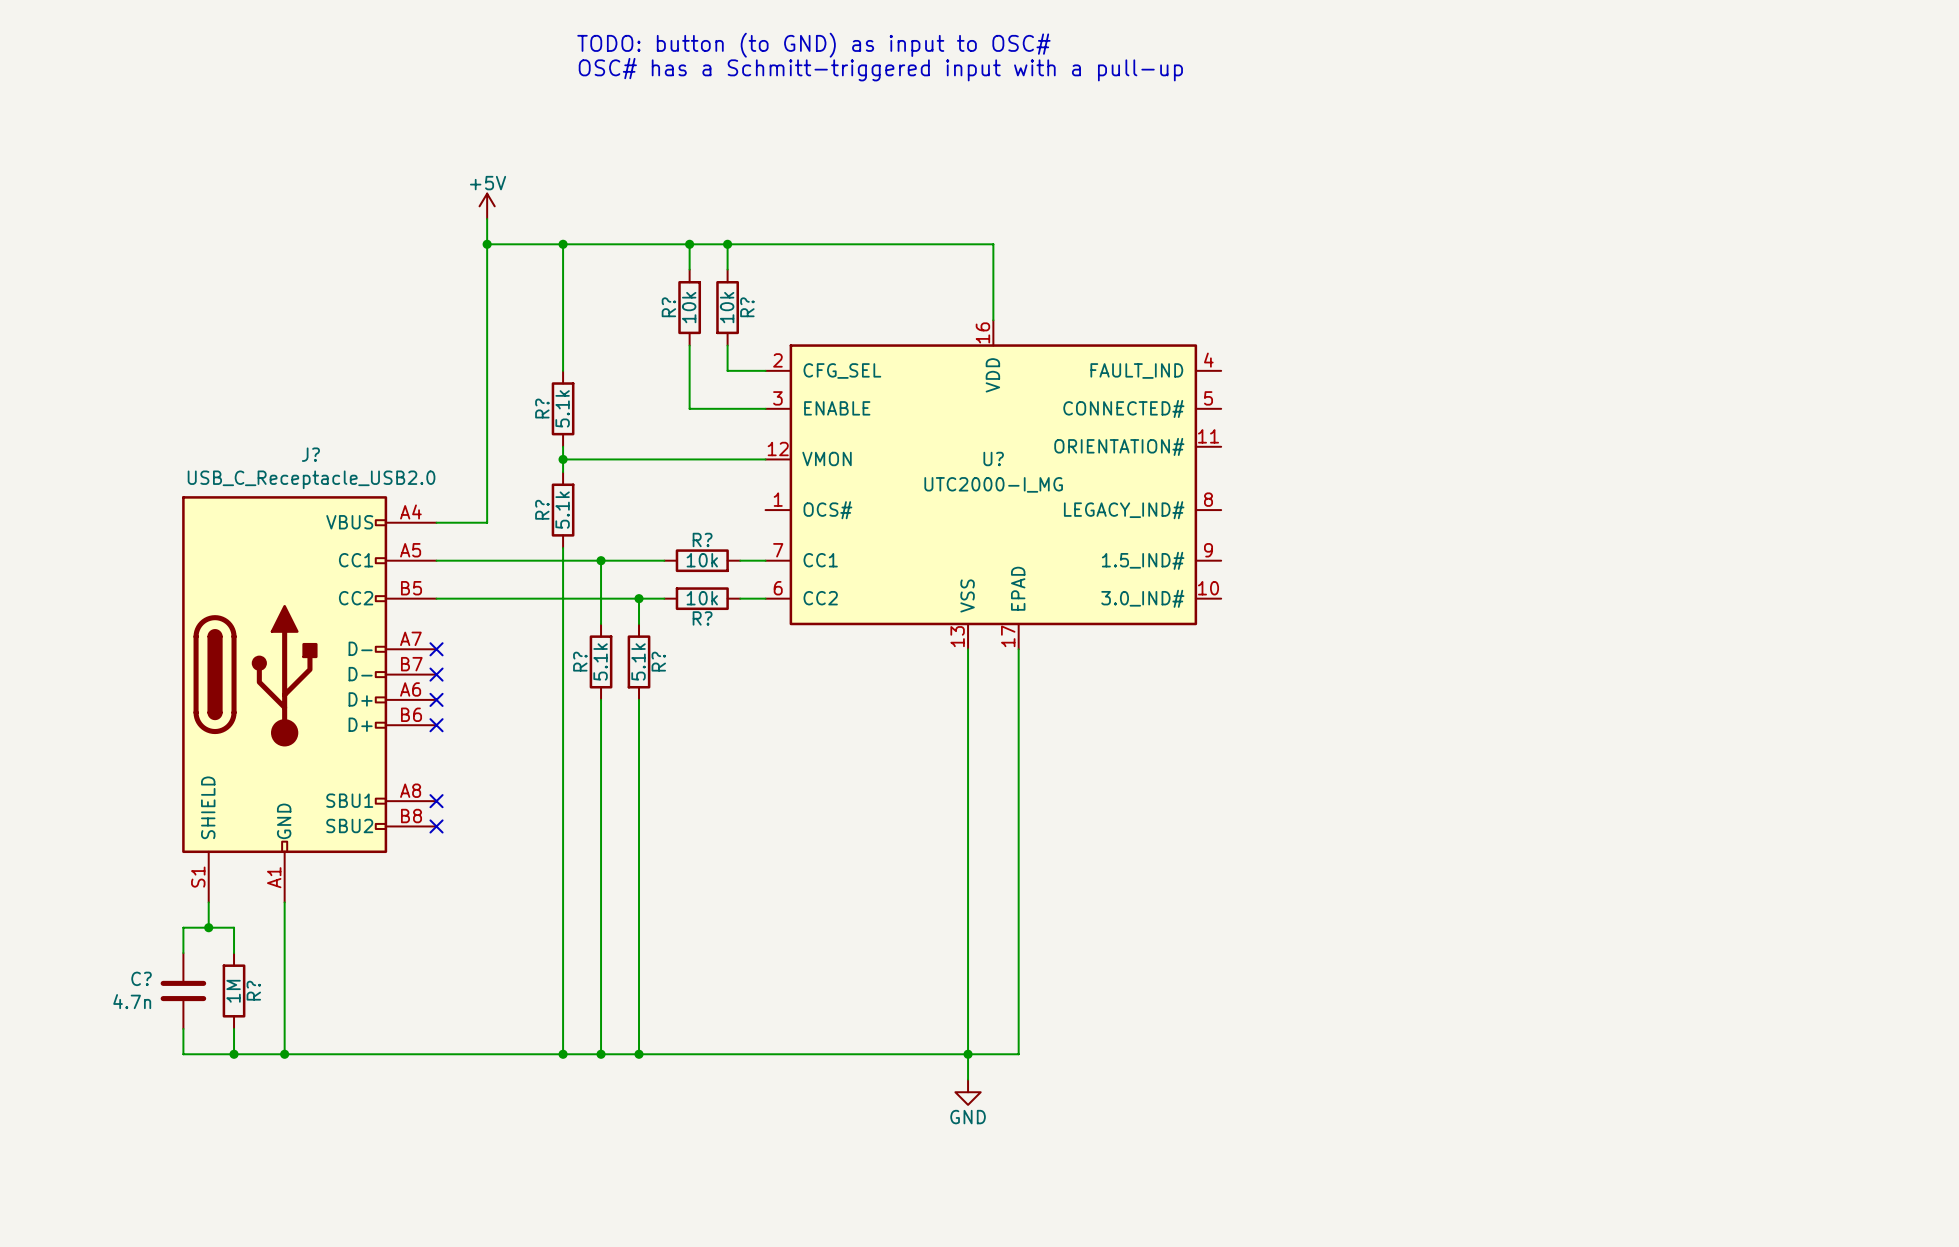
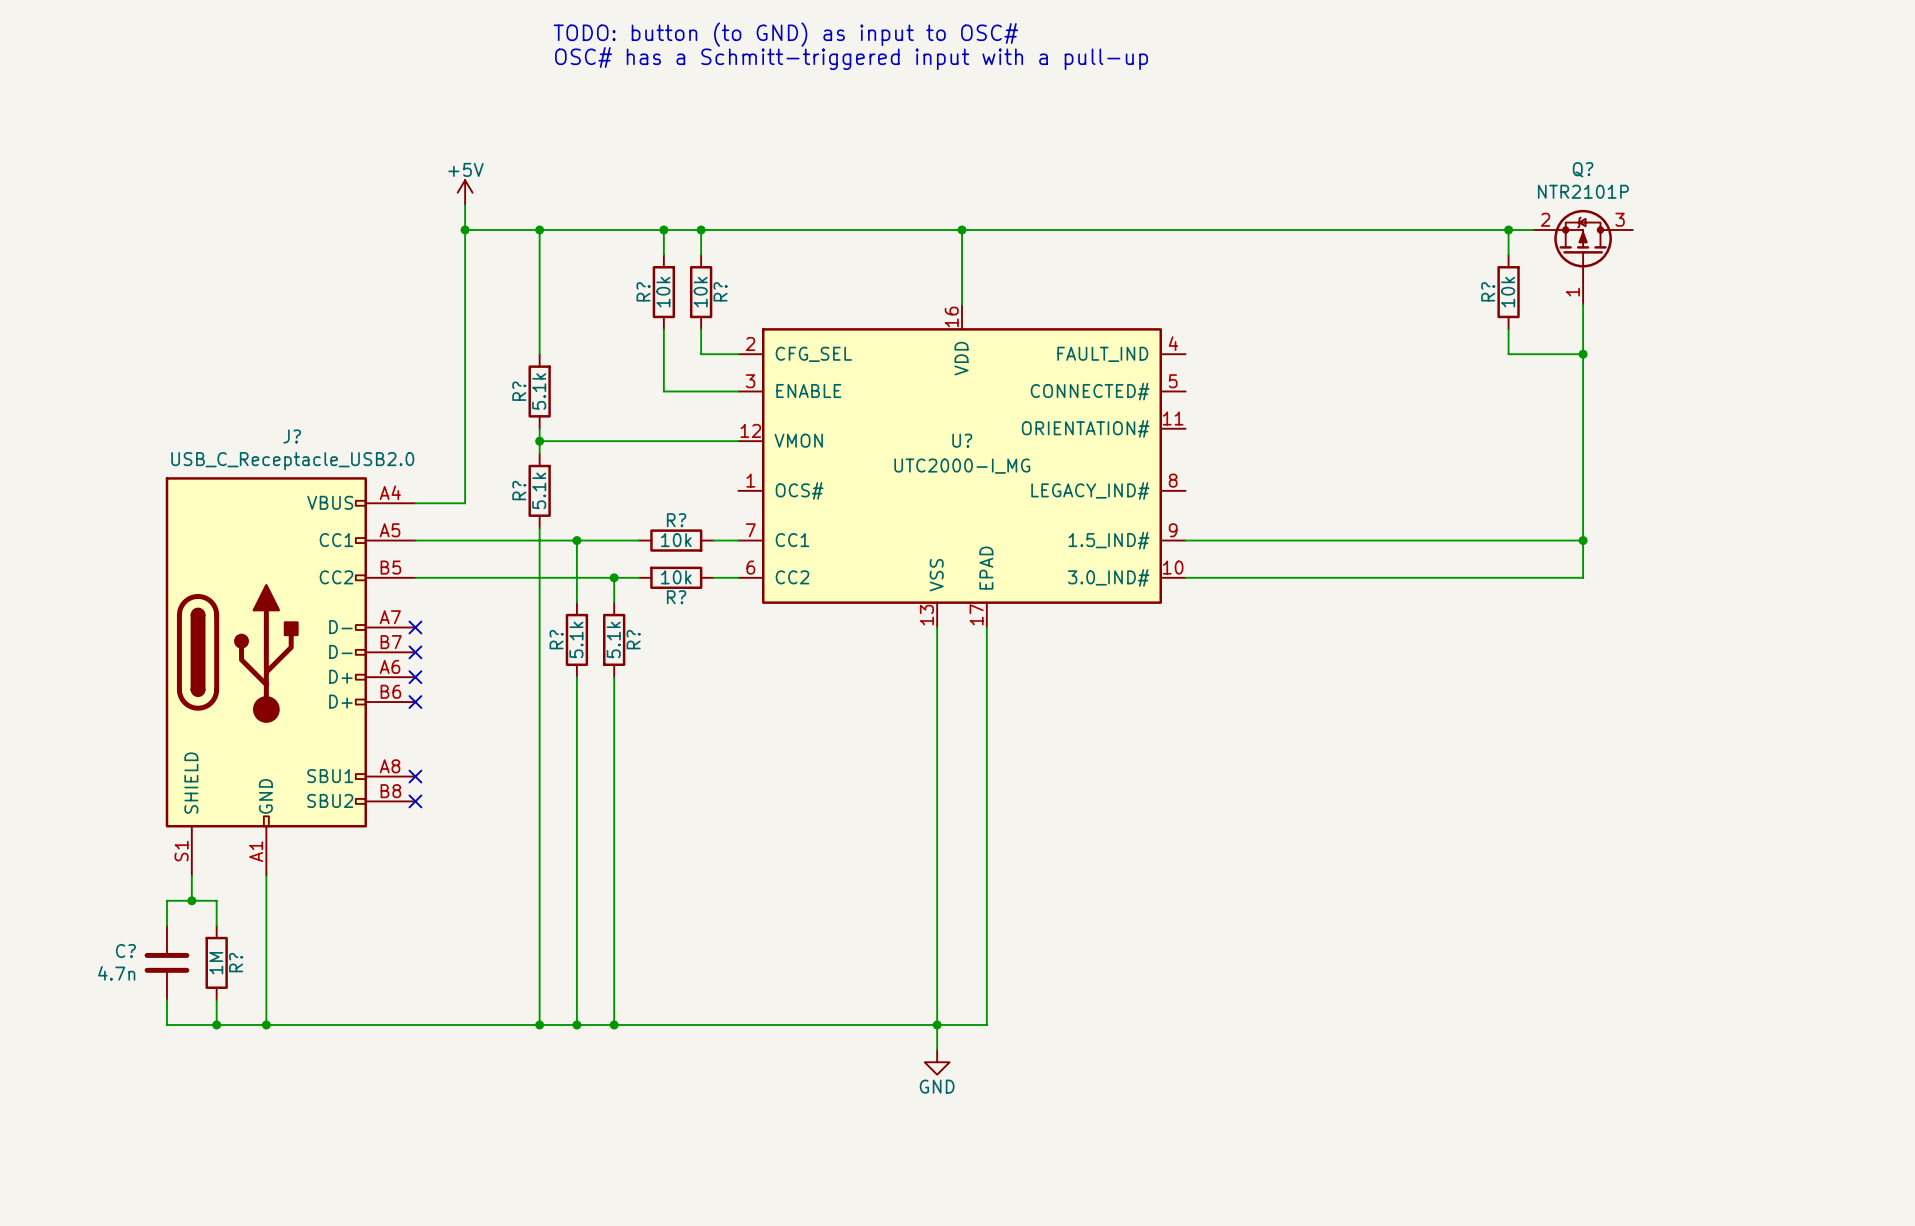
wire: none -> (961, 229) (1533, 229)
junction: none -> (961, 229)
wire: none -> (1508, 229) (1508, 254)
junction: none -> (1508, 229)
Q?: none -> NTR2101P (1583, 257)
R?: none -> 10k (1508, 292)
wire: none -> (1583, 304) (1583, 577) (1185, 577)
wire: none -> (1508, 329) (1508, 354) (1583, 354)
junction: none -> (1583, 354)
wire: none -> (1185, 540) (1583, 540)
junction: none -> (1583, 540)

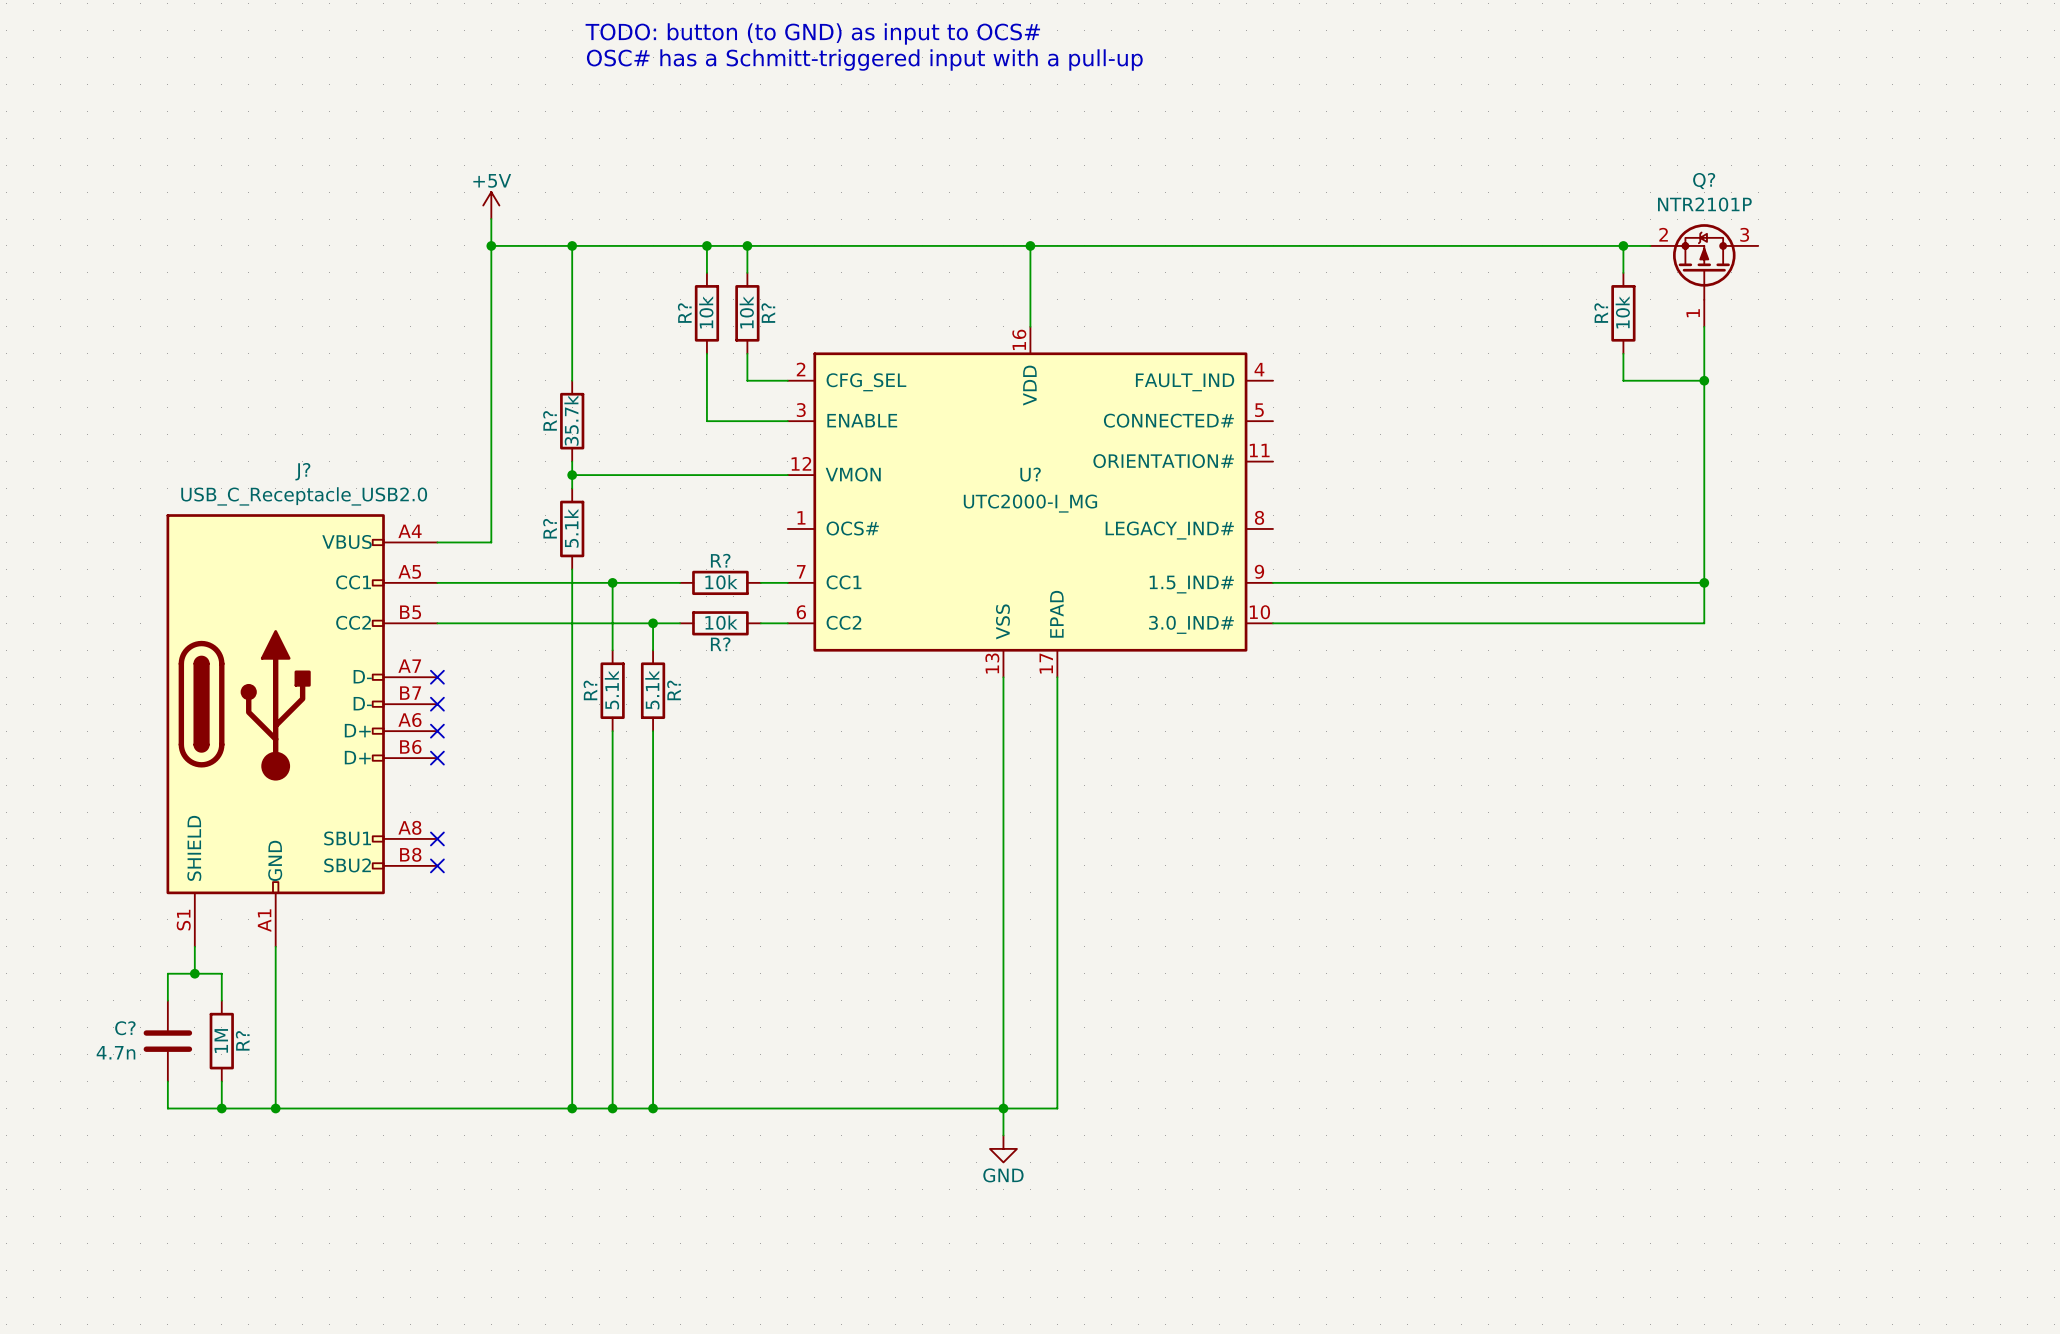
text: TODO: button (to GND) as input to OSC# (785, 34) -> TODO: button (to GND) as input to OCS# (812, 33)
R? value: 5.1k (539, 391) -> 35.7k (571, 420)

